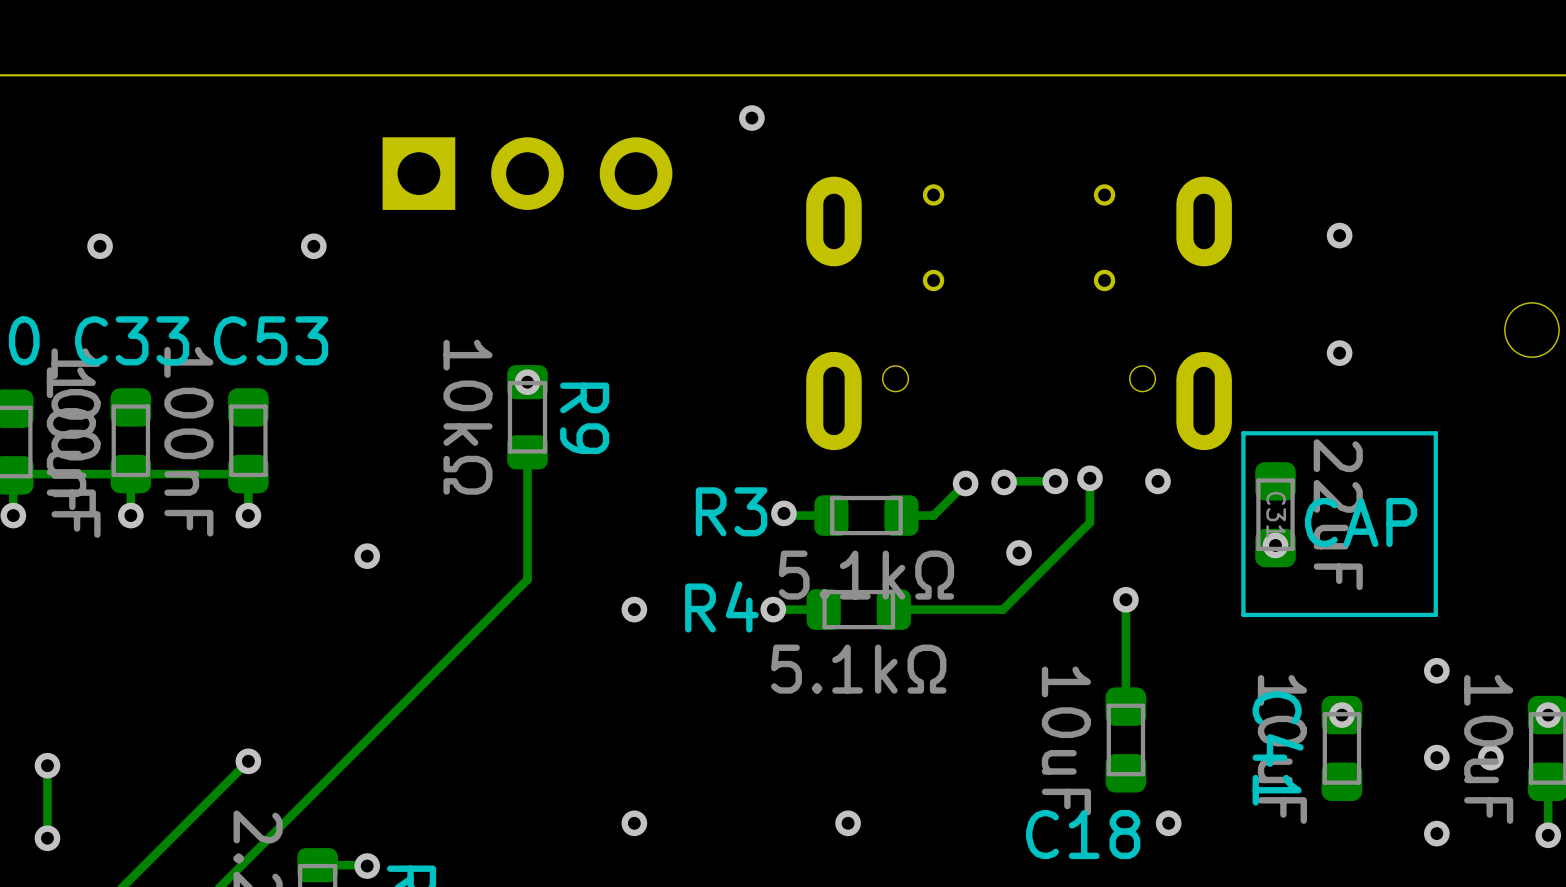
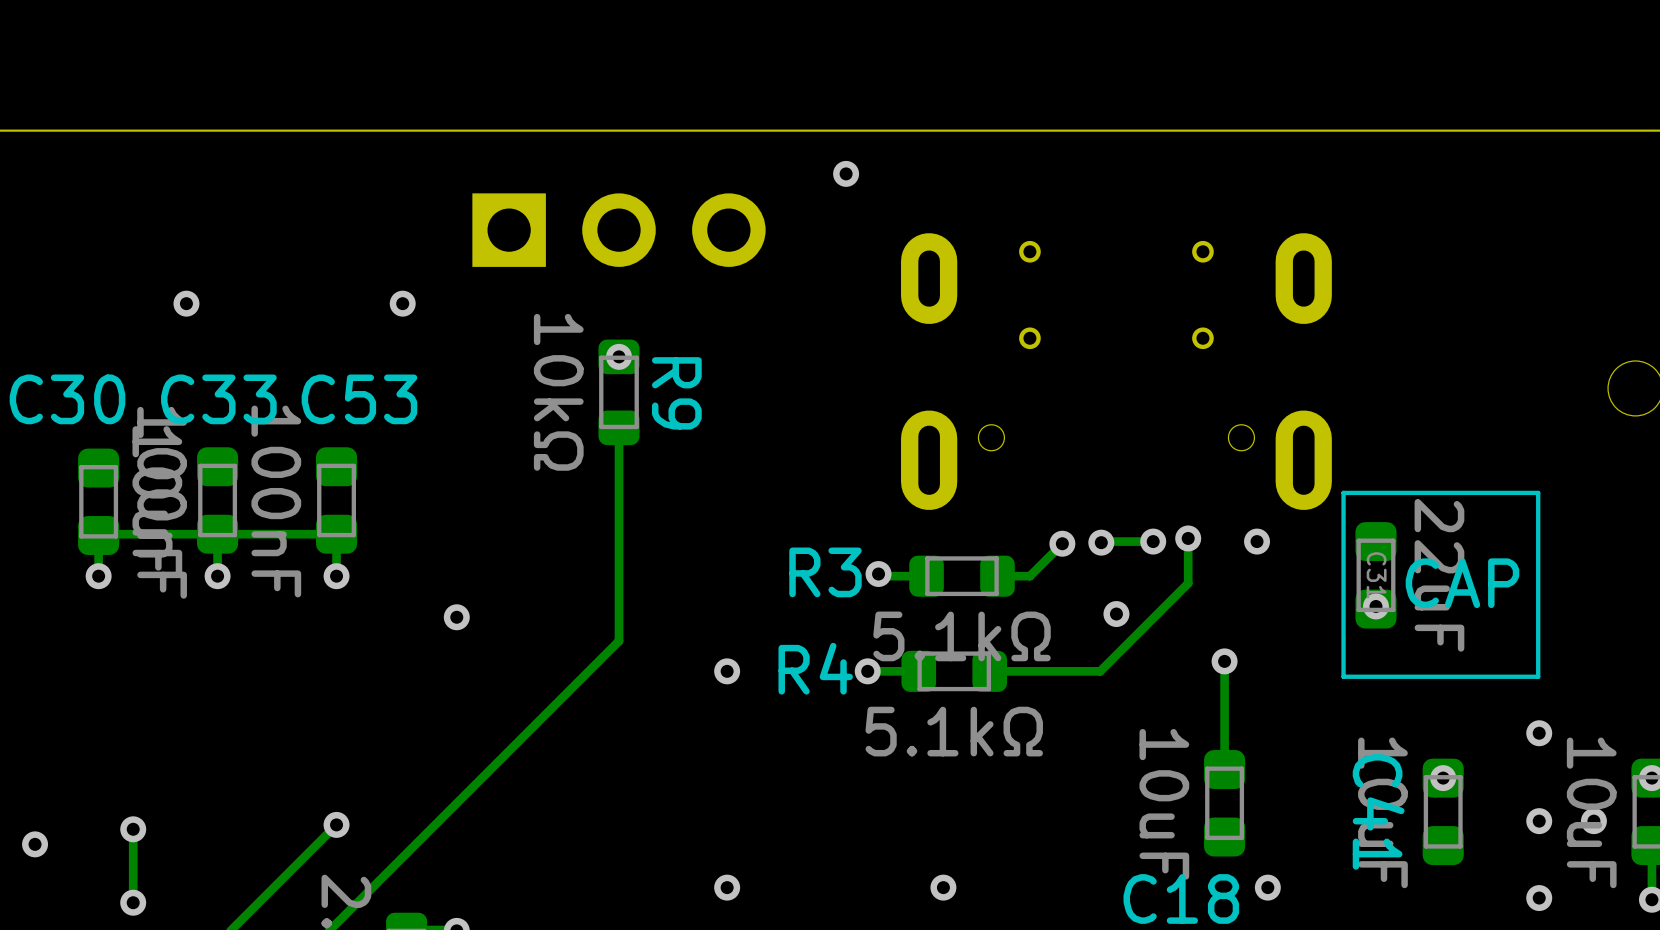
via: (1339, 235) -> none
via: (1339, 353) -> none
track: none -> (619, 427) (619, 512)
via position: (527, 382) -> (619, 356)
R9 position: (527, 417) -> (619, 392)

